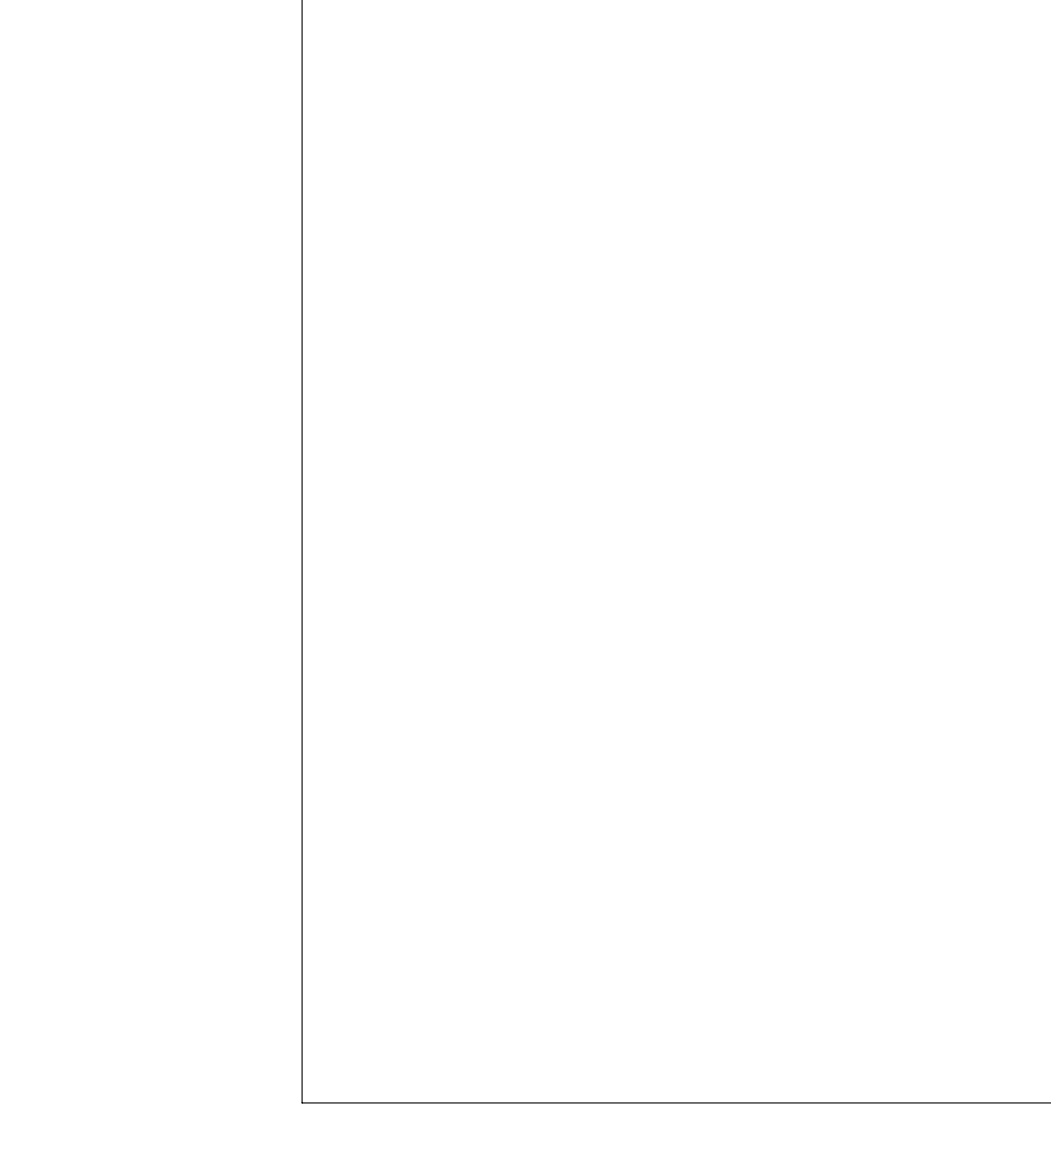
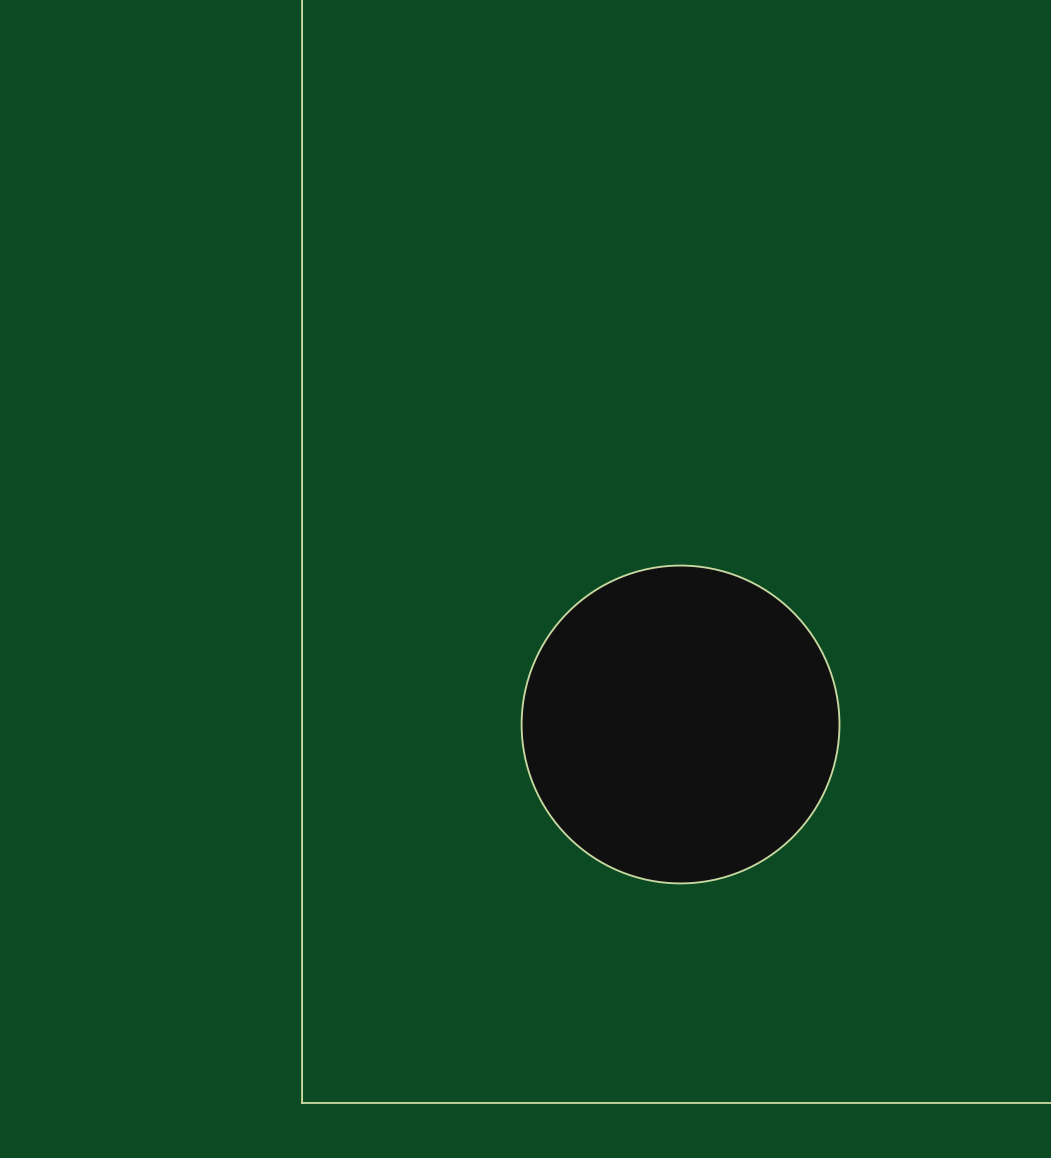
hole: none -> (680, 724)

